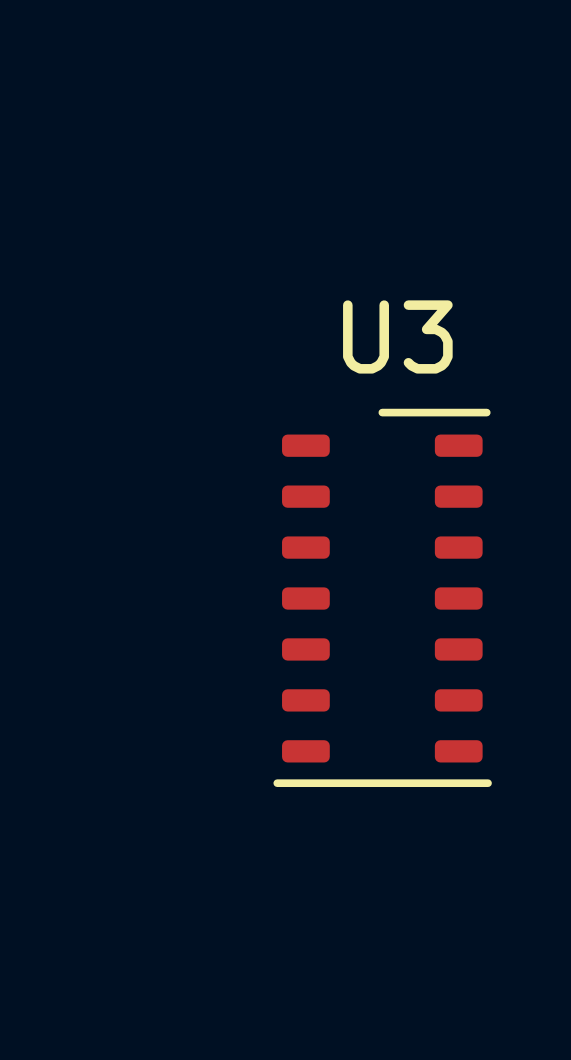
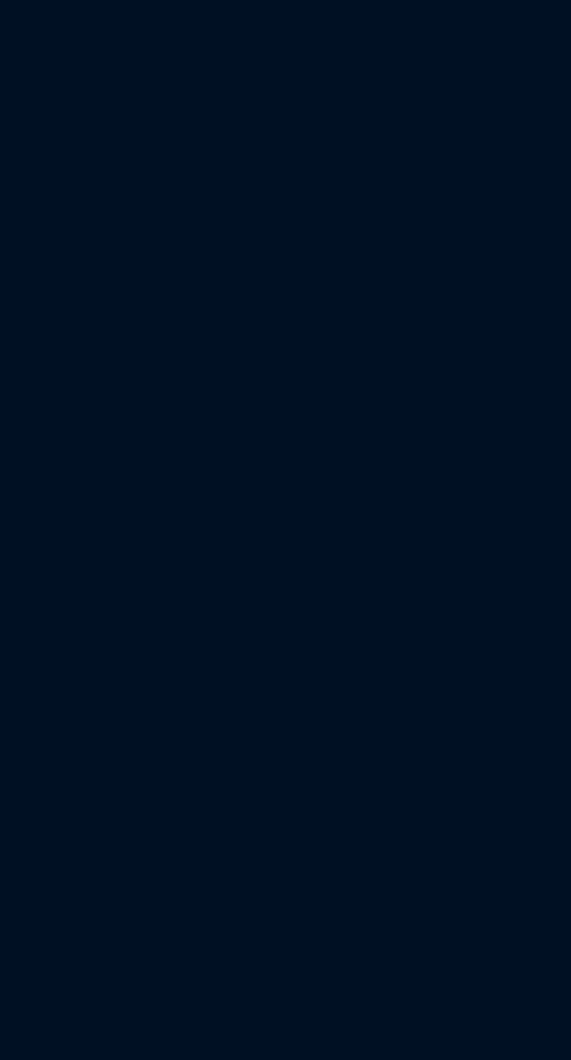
U3: (382, 597) -> none

